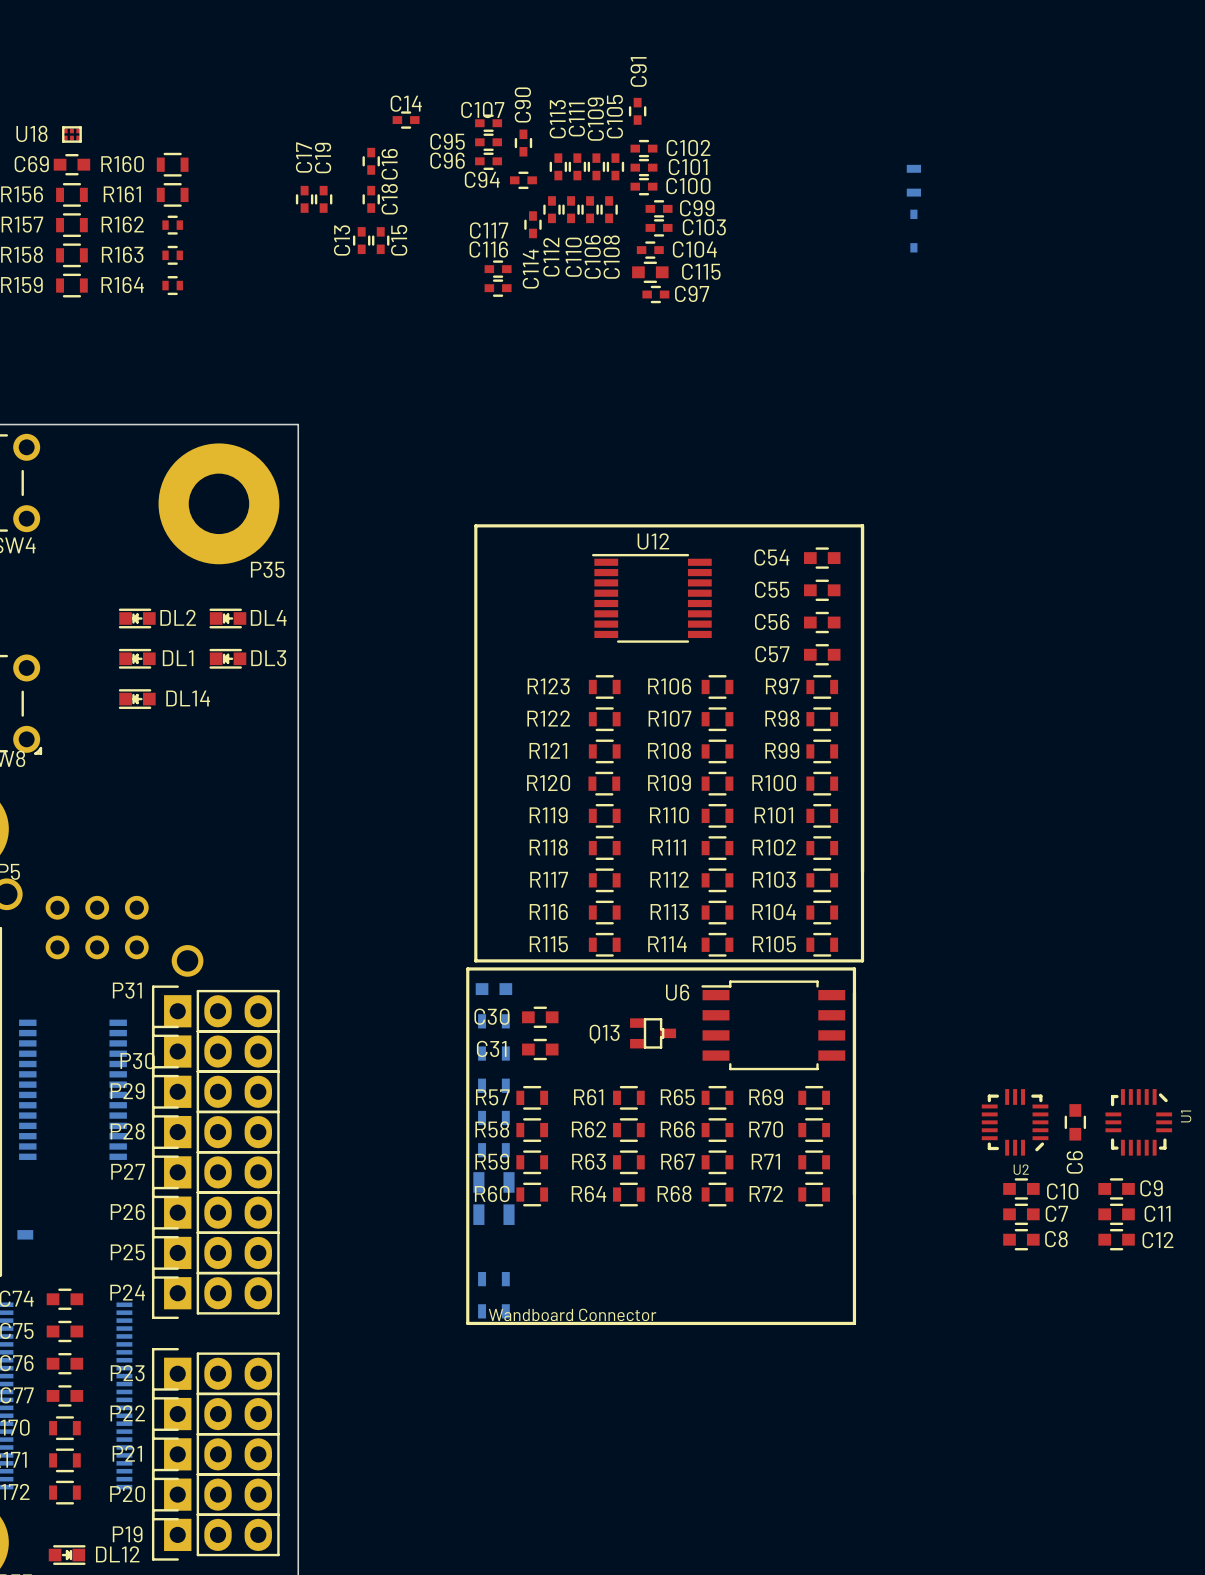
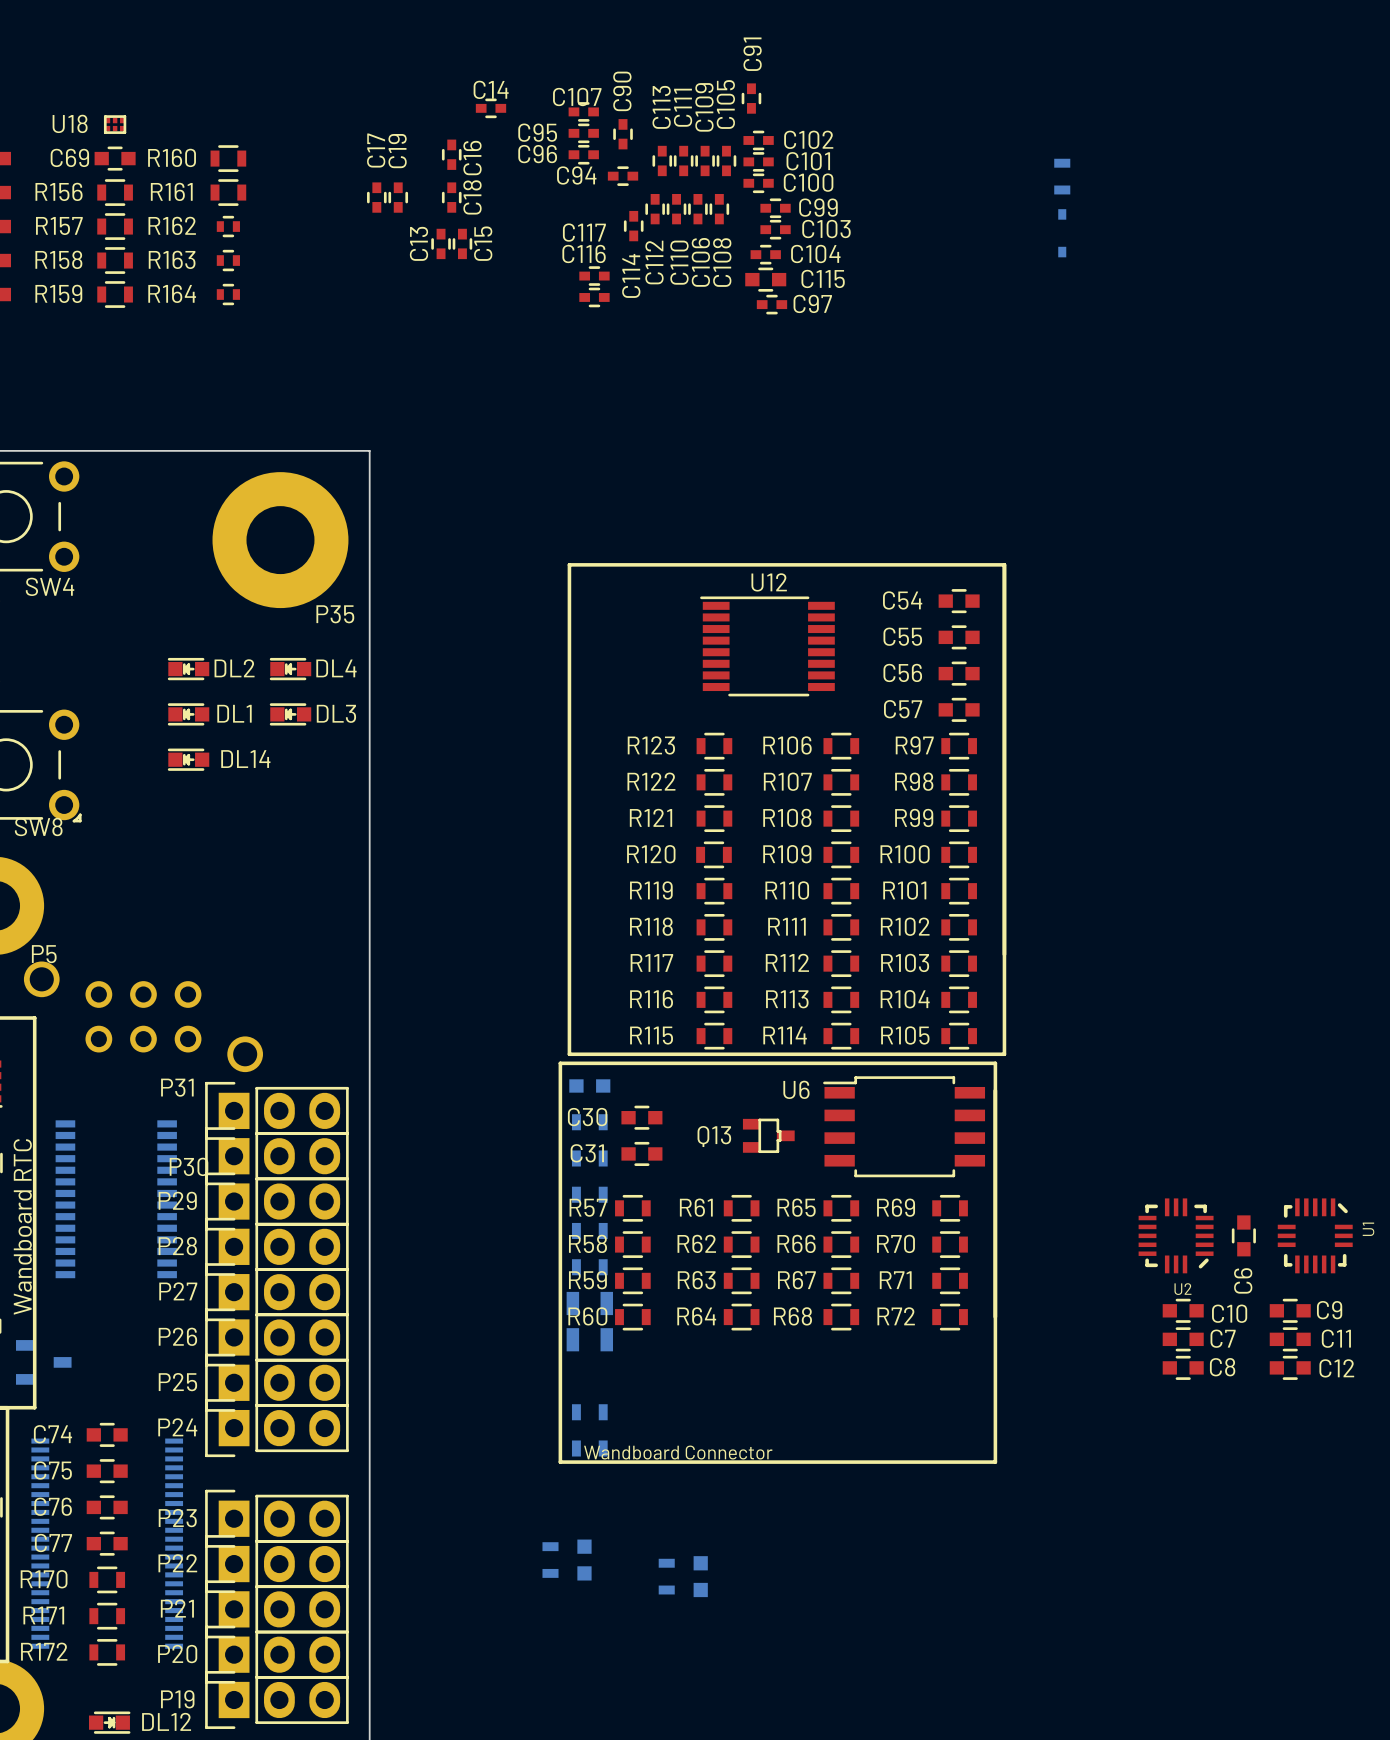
part: none -> (550, 1560)
part: none -> (584, 1560)
part: none -> (666, 1576)
part: none -> (700, 1576)

